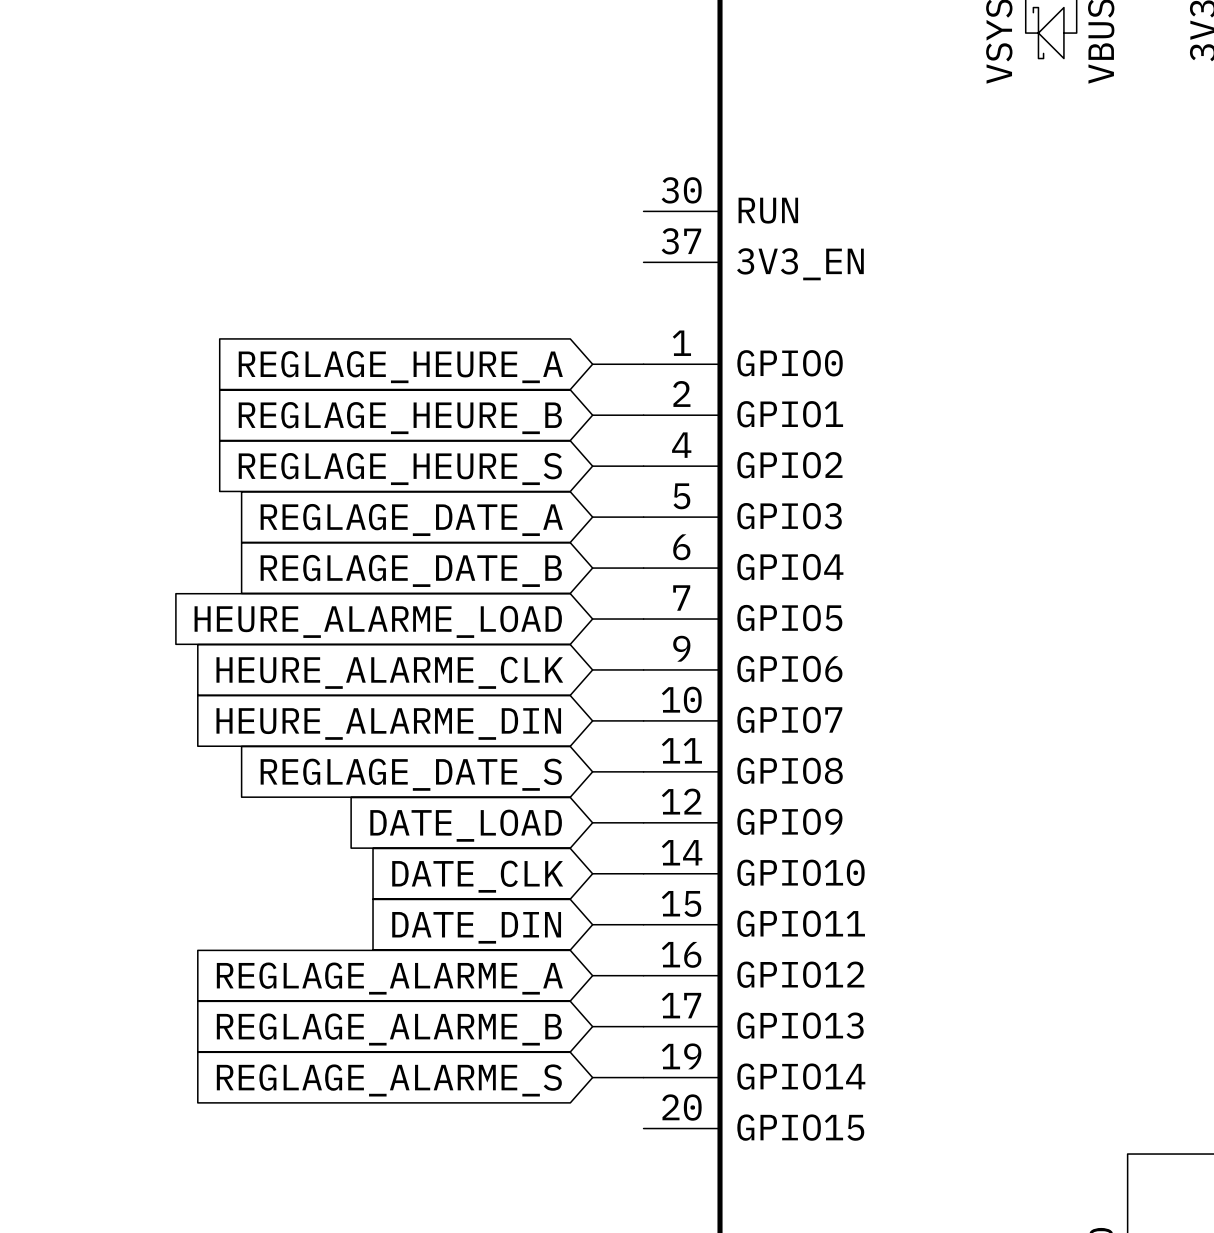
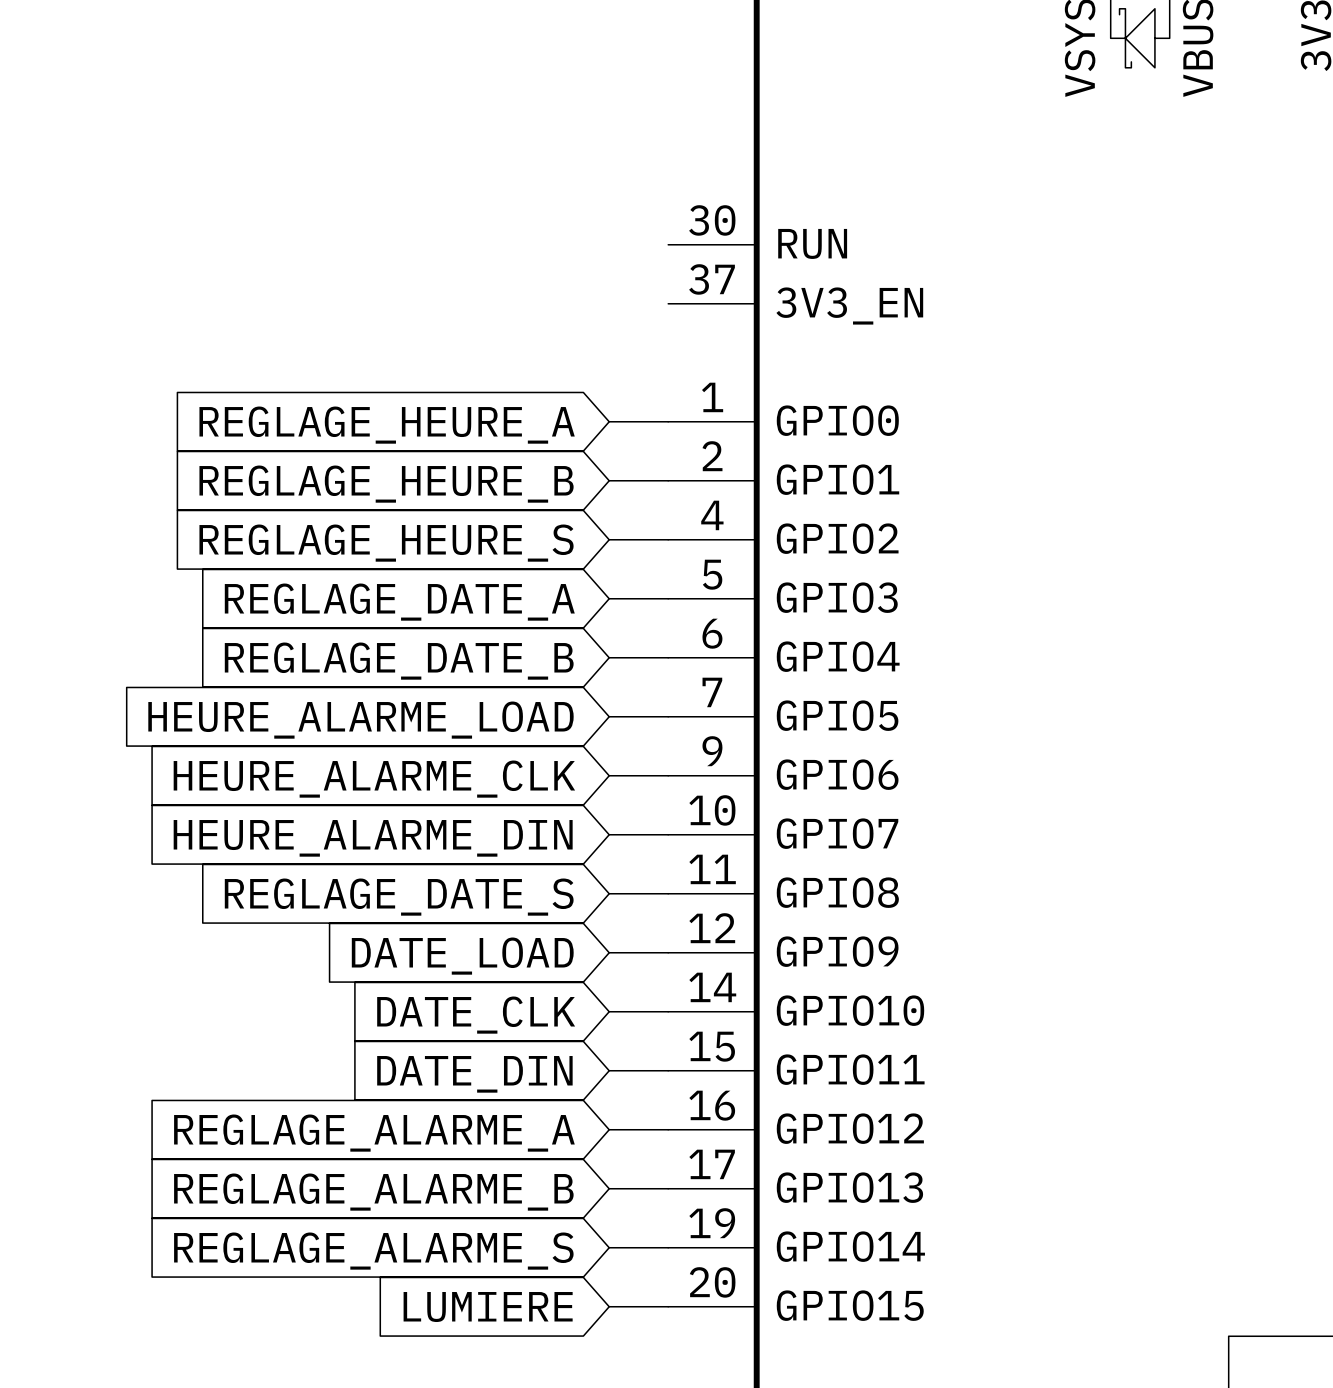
global label: none -> LUMIERE (488, 1307)
wire: none -> (609, 1306) (668, 1306)

